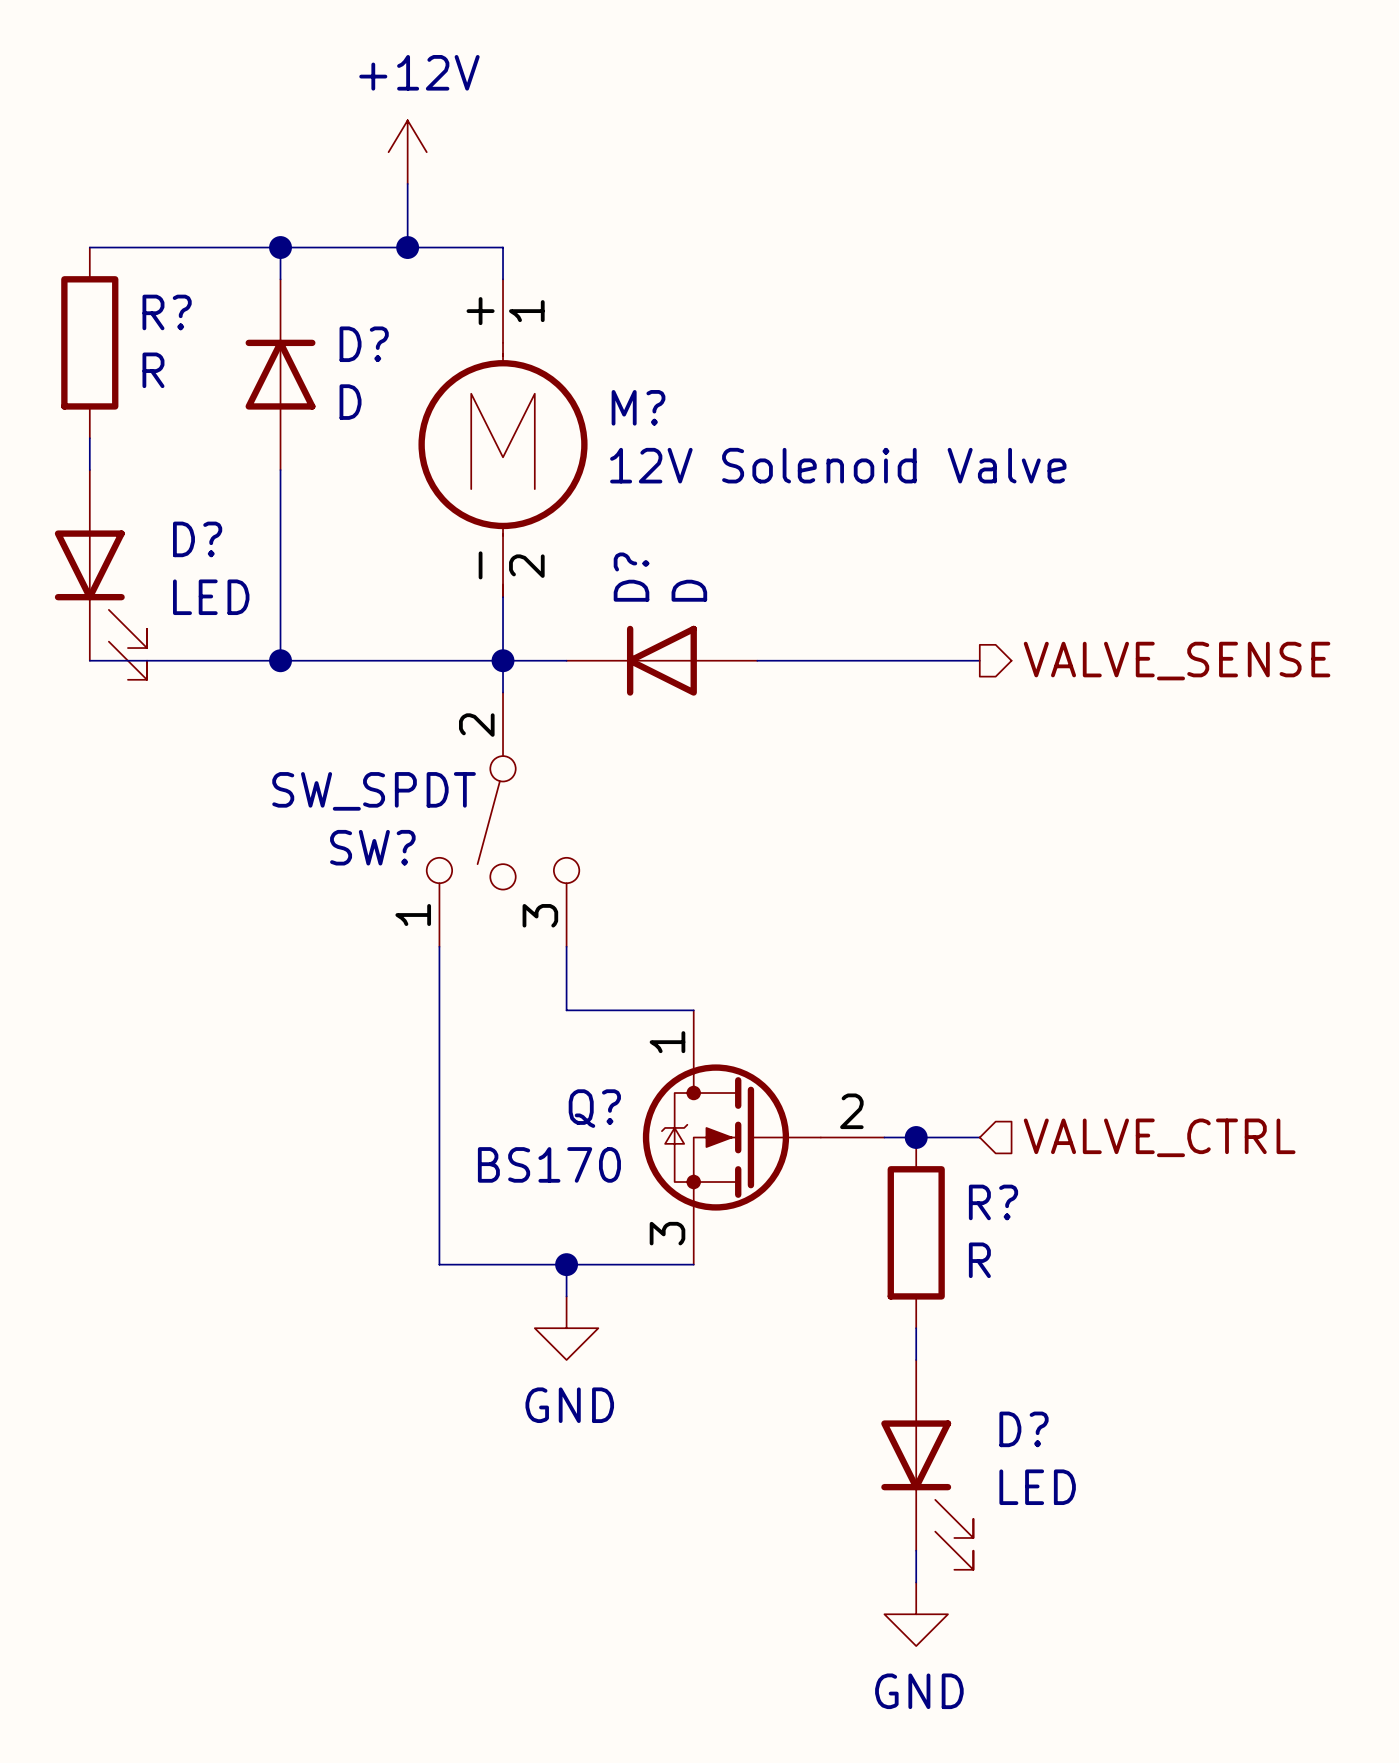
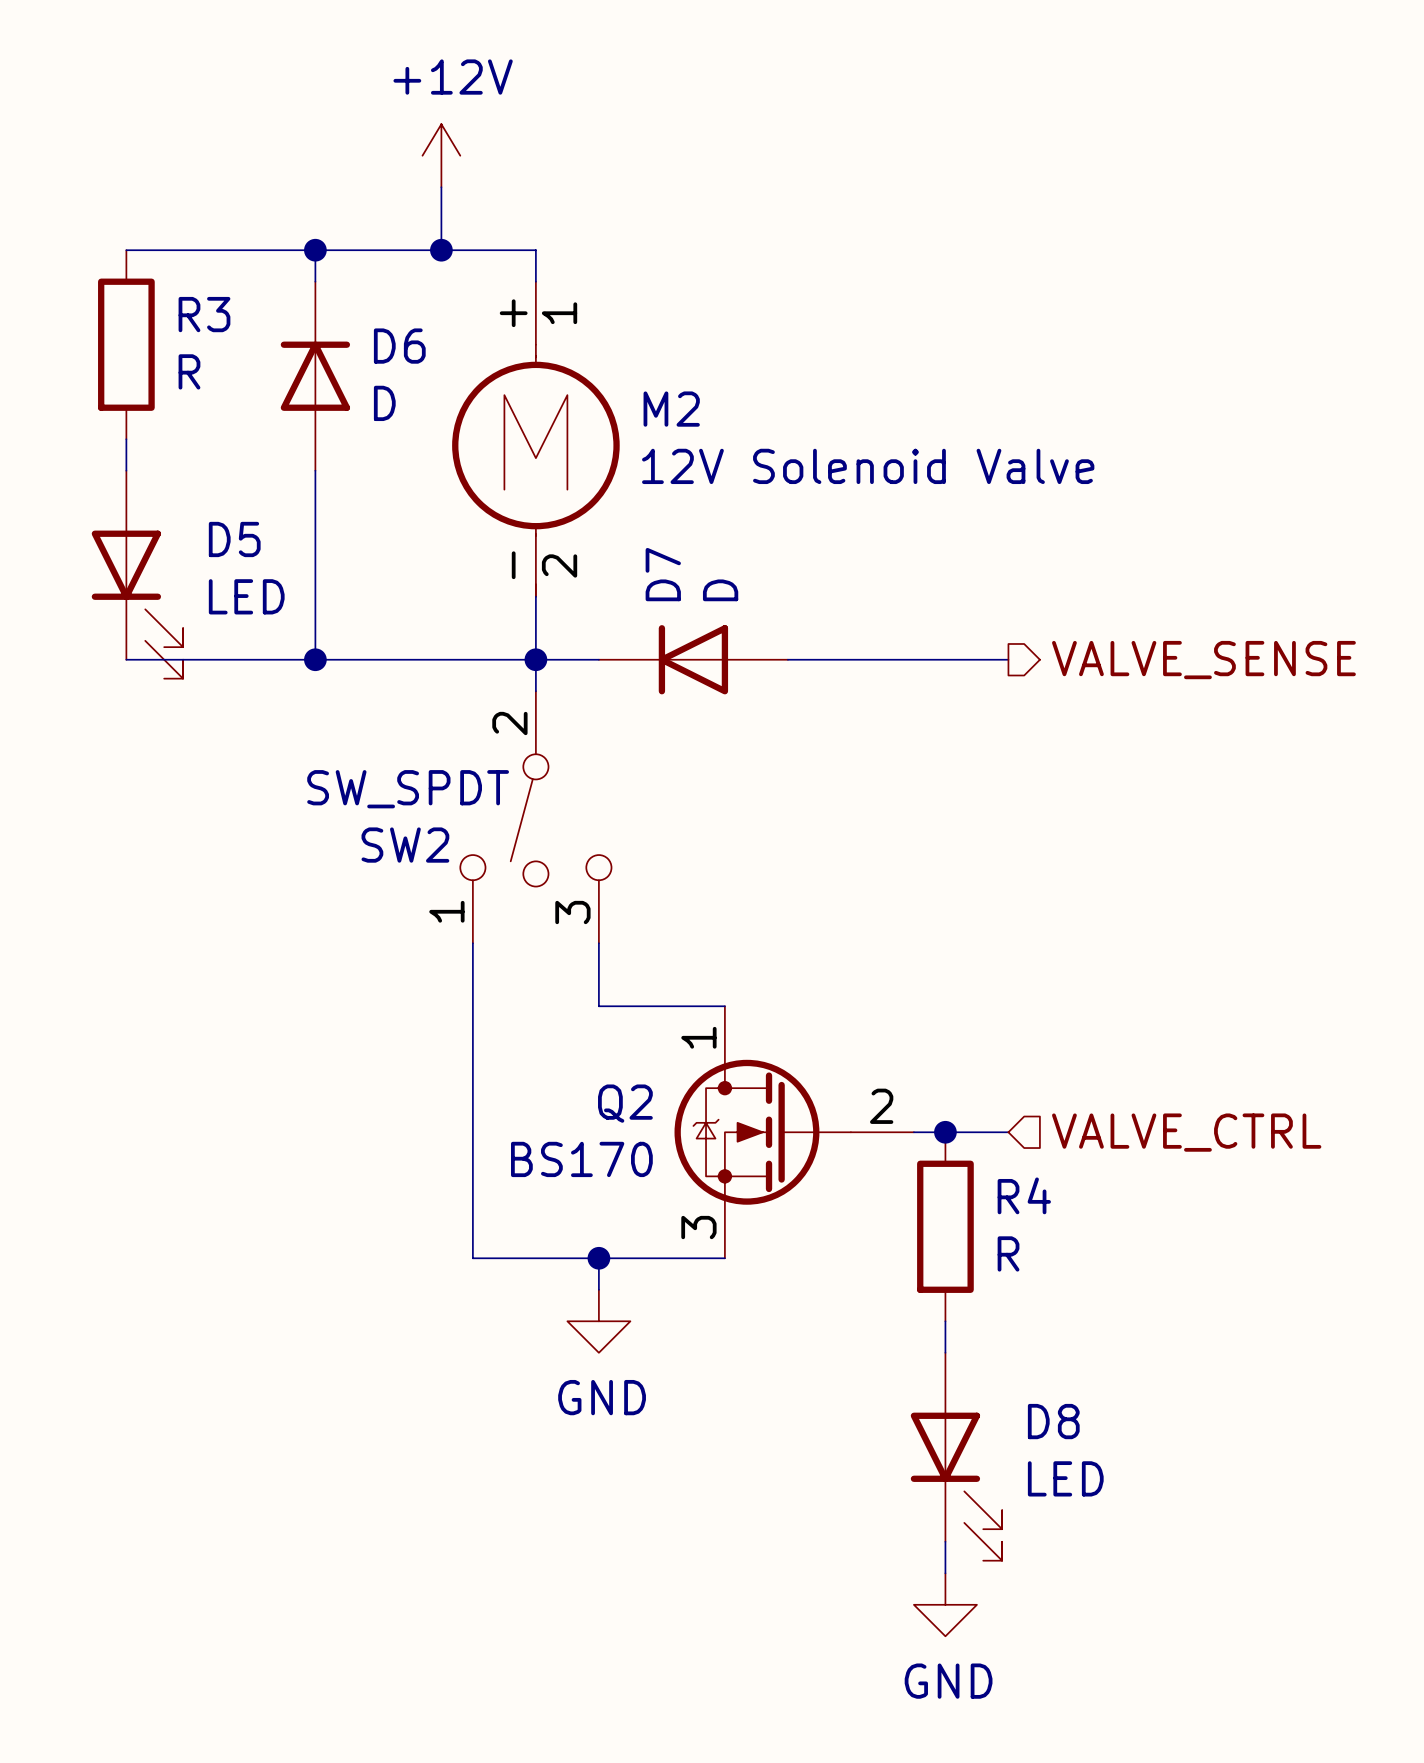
R? name: R? (167, 312) -> R3 (204, 314)
D? name: D? (364, 344) -> D6 (399, 346)
M? name: M? (638, 407) -> M2 (671, 409)
D? name: D? (197, 539) -> D5 (234, 539)
D? name: D? (631, 577) -> D7 (663, 574)
SW? name: SW? (372, 847) -> SW2 (405, 845)
Q? name: Q? (594, 1108) -> Q2 (625, 1103)
R? name: R? (993, 1202) -> R4 (1024, 1195)
D? name: D? (1024, 1429) -> D8 (1053, 1421)

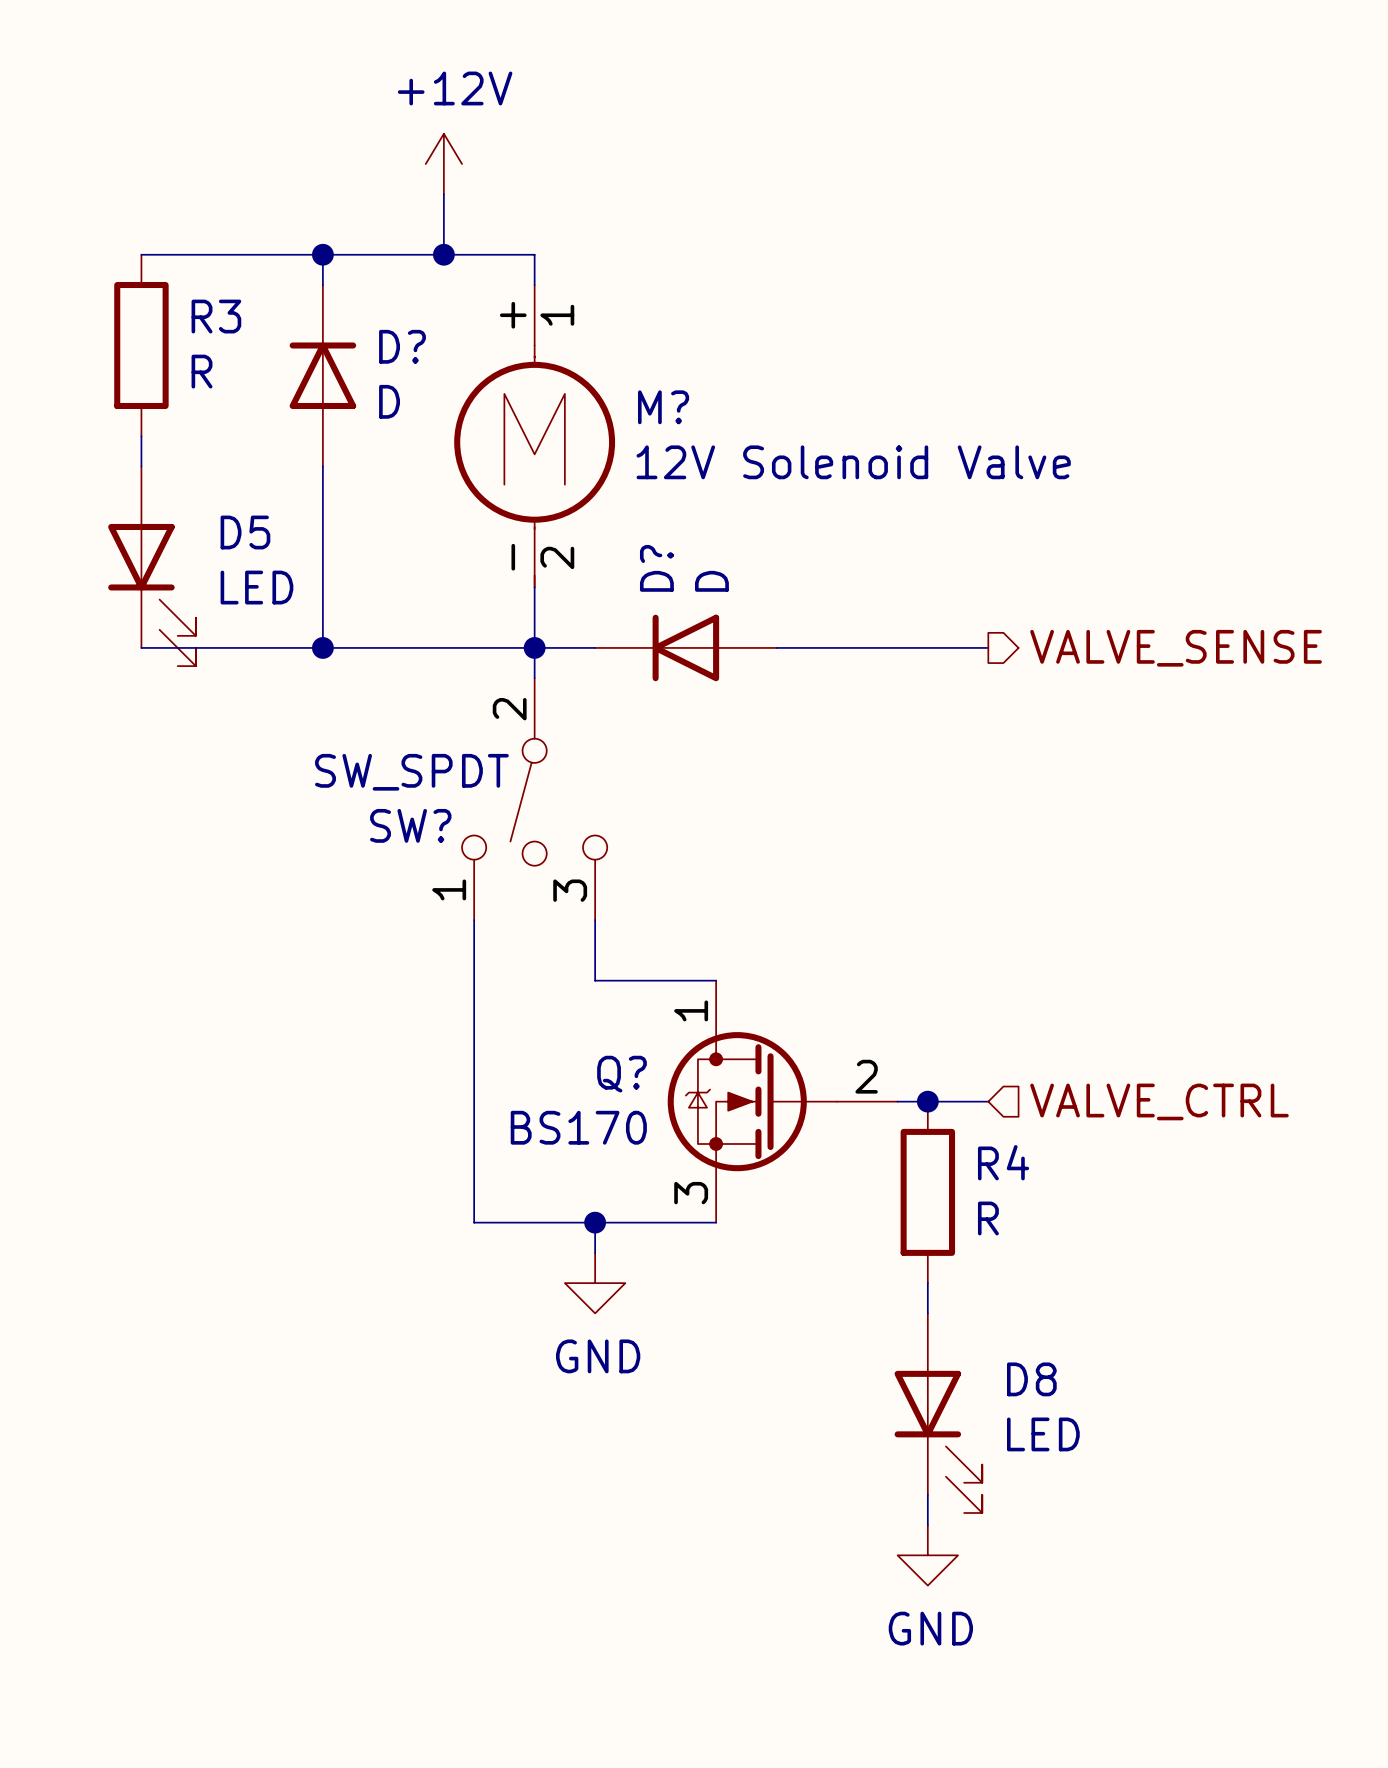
D6 name: D6 (399, 346) -> D? (402, 346)
M2 name: M2 (671, 409) -> M? (663, 407)
D7 name: D7 (663, 574) -> D? (656, 568)
SW2 name: SW2 (405, 845) -> SW? (410, 825)
Q2 name: Q2 (625, 1103) -> Q? (622, 1074)

